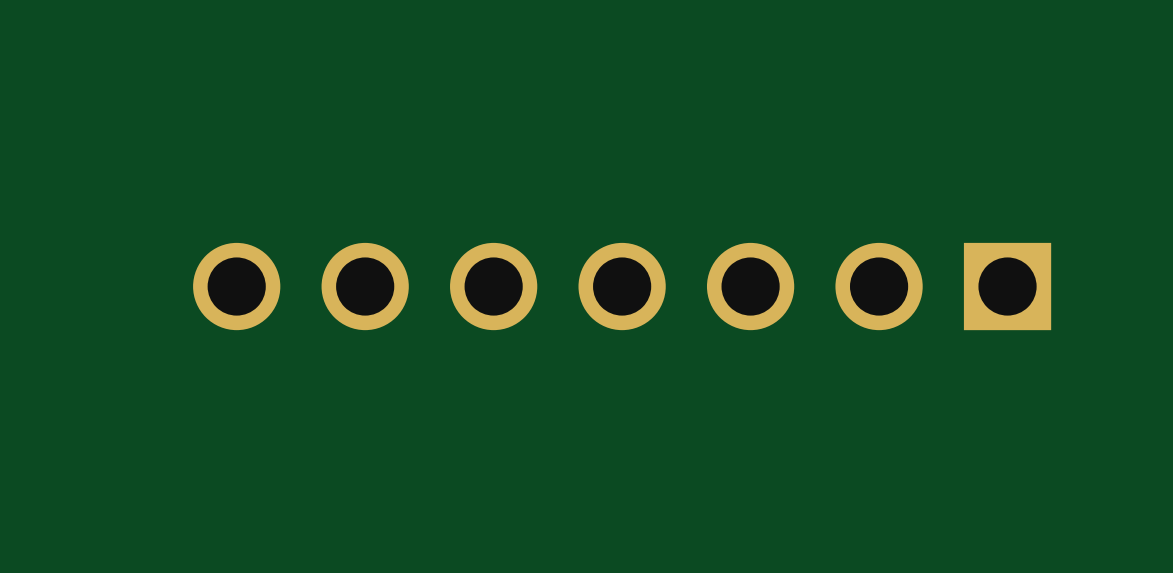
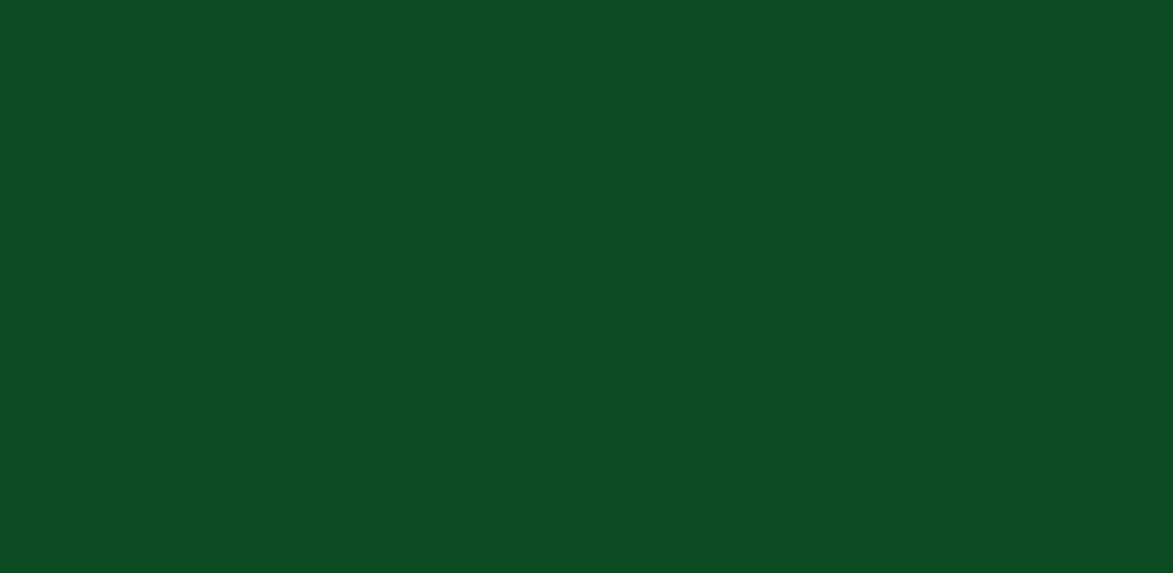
part: (622, 286) -> none

